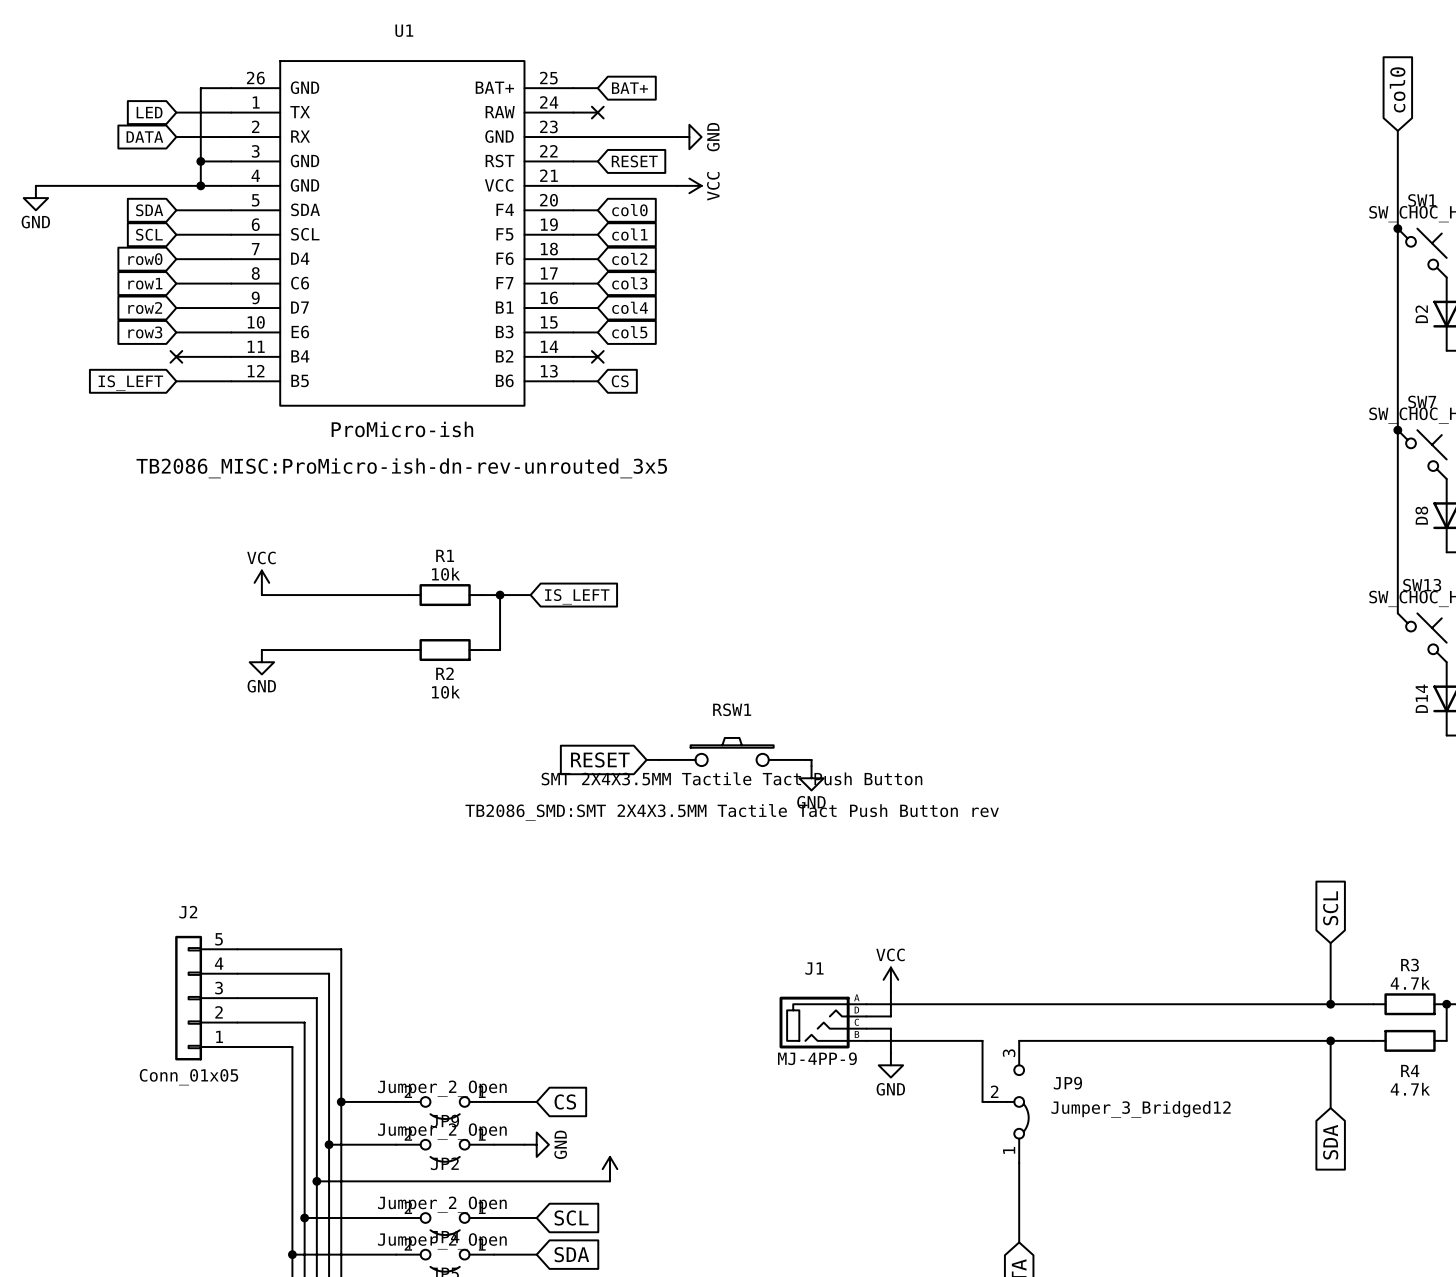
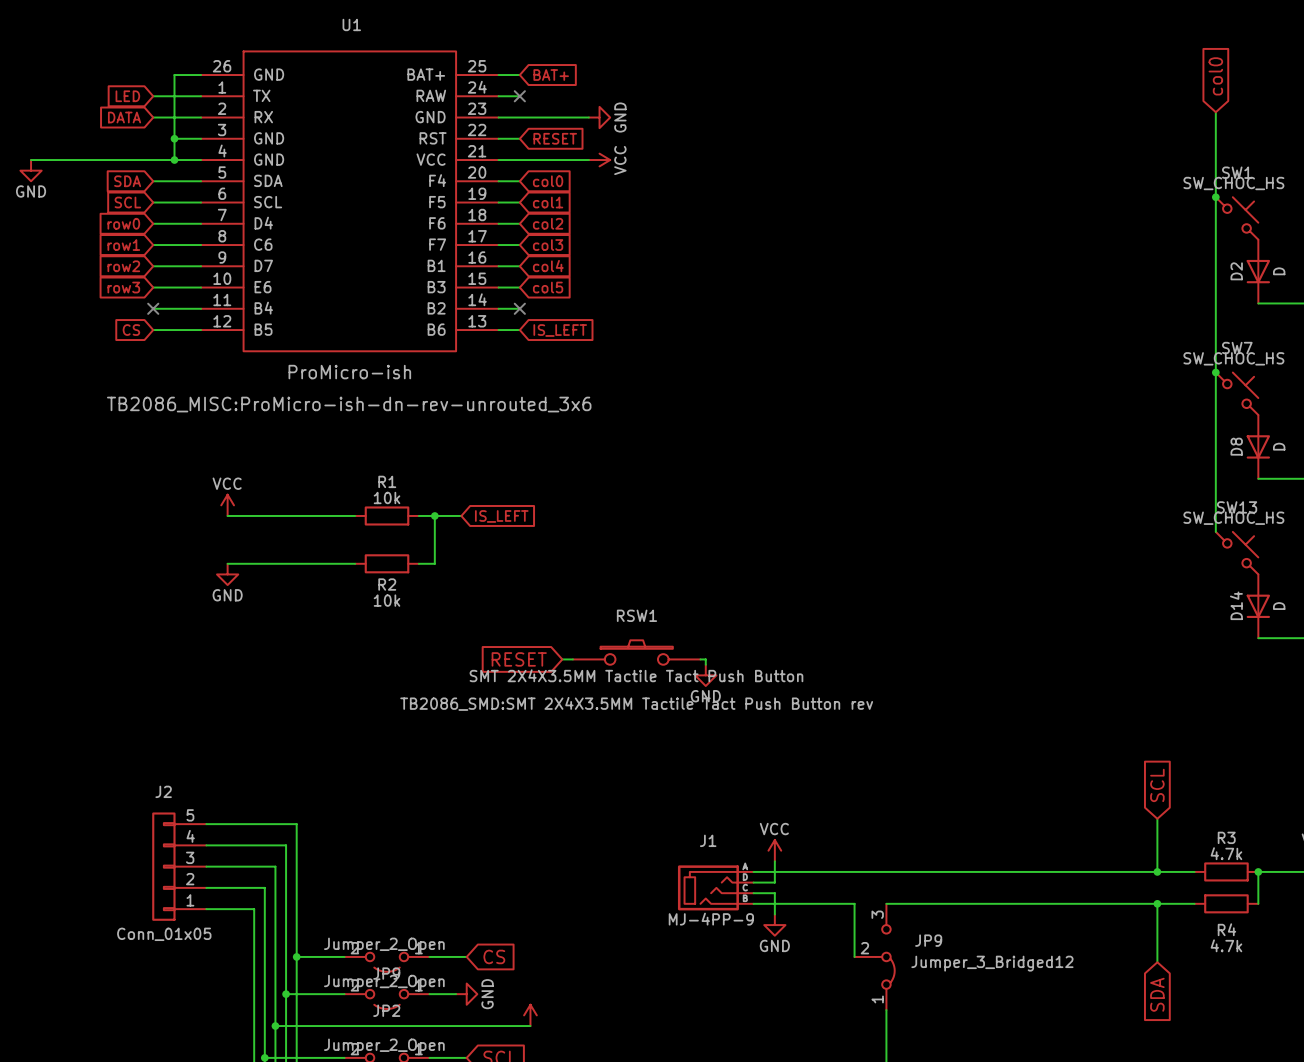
global label: CS (620, 381) -> IS_LEFT (560, 330)
global label: IS_LEFT (130, 383) -> CS (131, 330)
U1 text: TB2086_MISC:ProMicro-ish-dn-rev-unrouted_3x5 (401, 468) -> TB2086_MISC:ProMicro-ish-dn-rev-unrouted_3x6 (349, 404)

